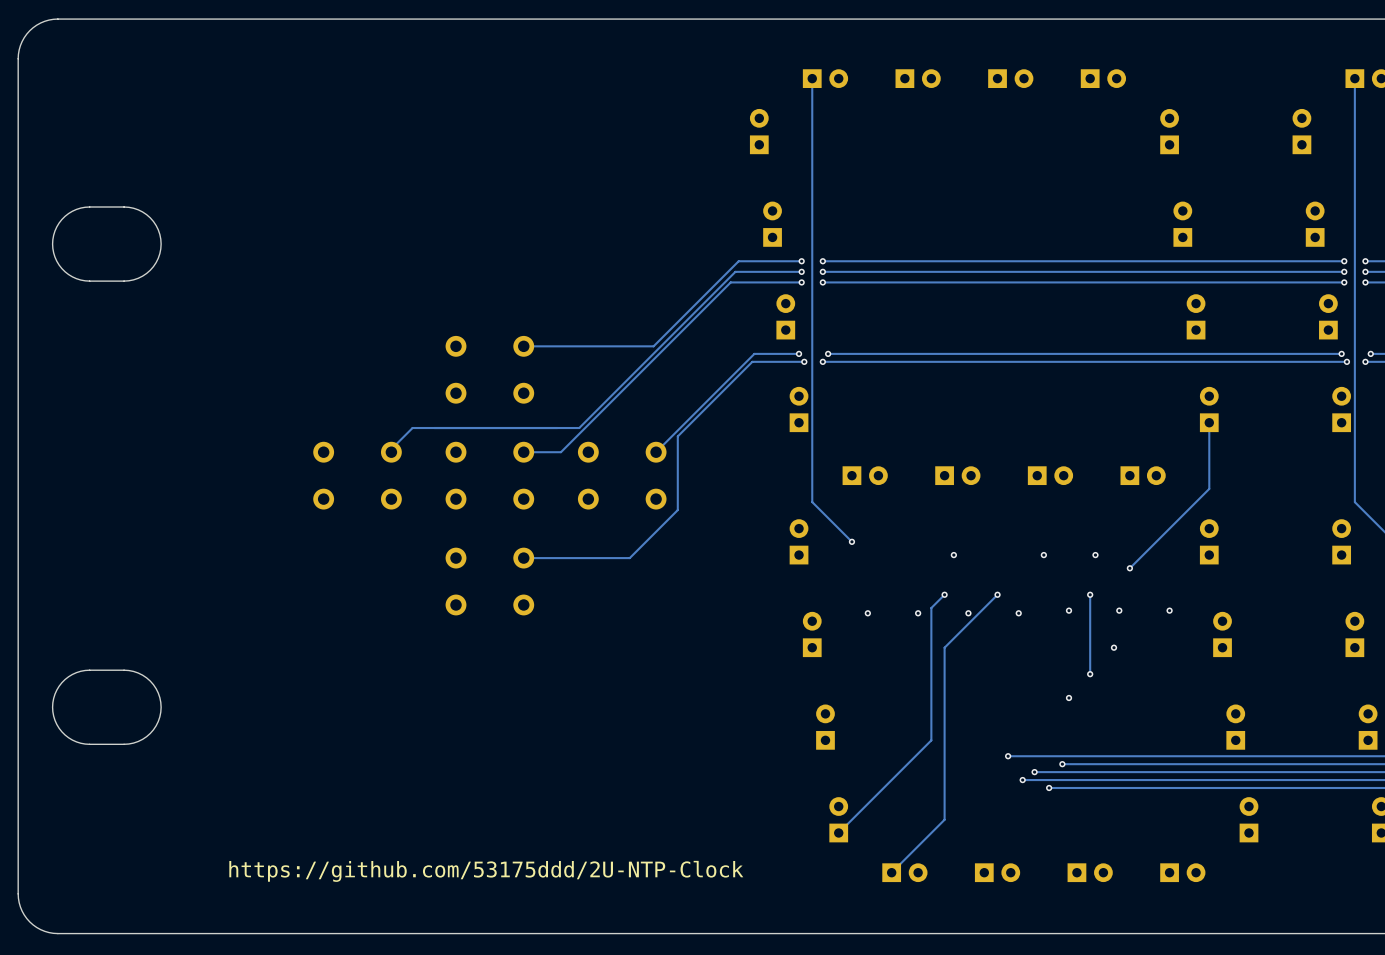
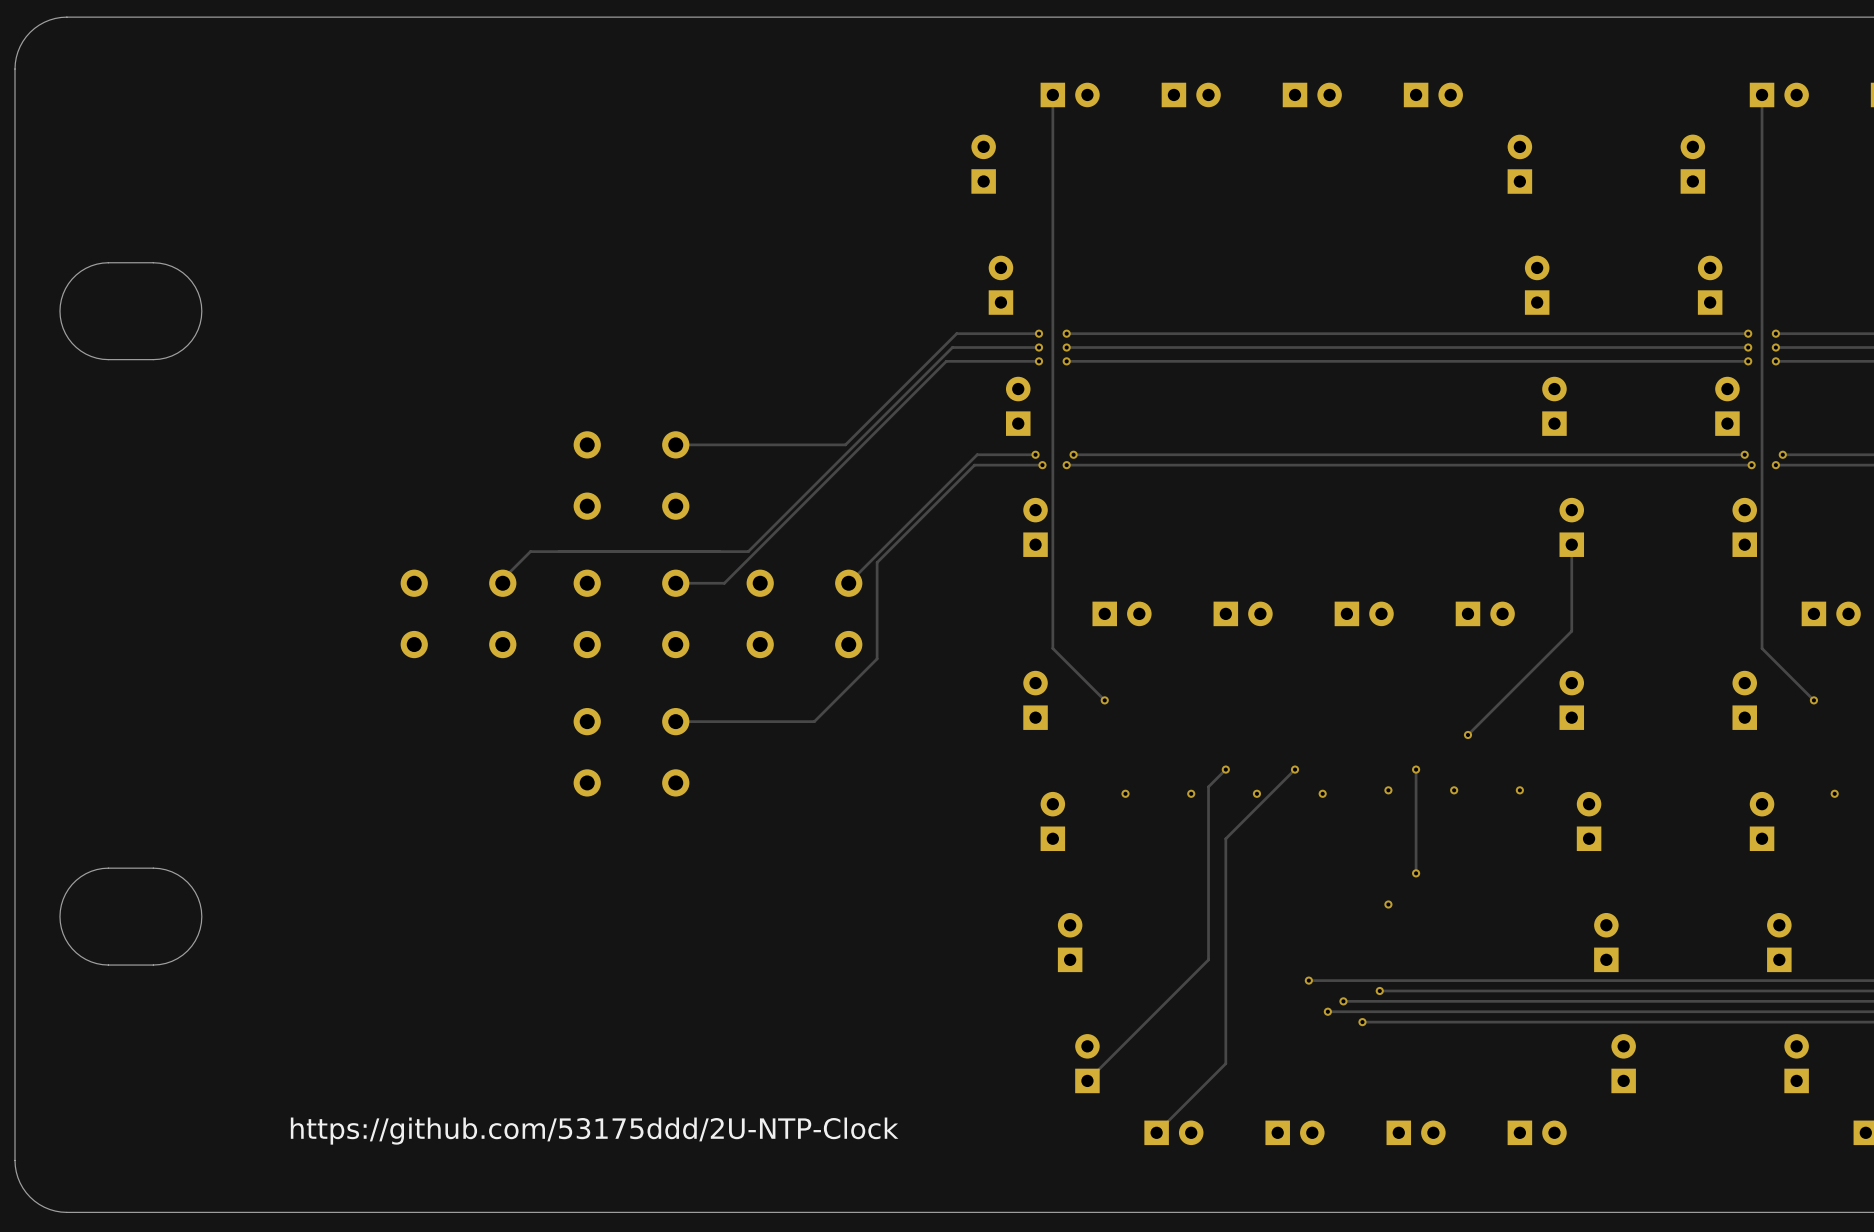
via: (953, 555) -> none
via: (1043, 555) -> none
via: (1095, 555) -> none
via: (1114, 647) -> none

